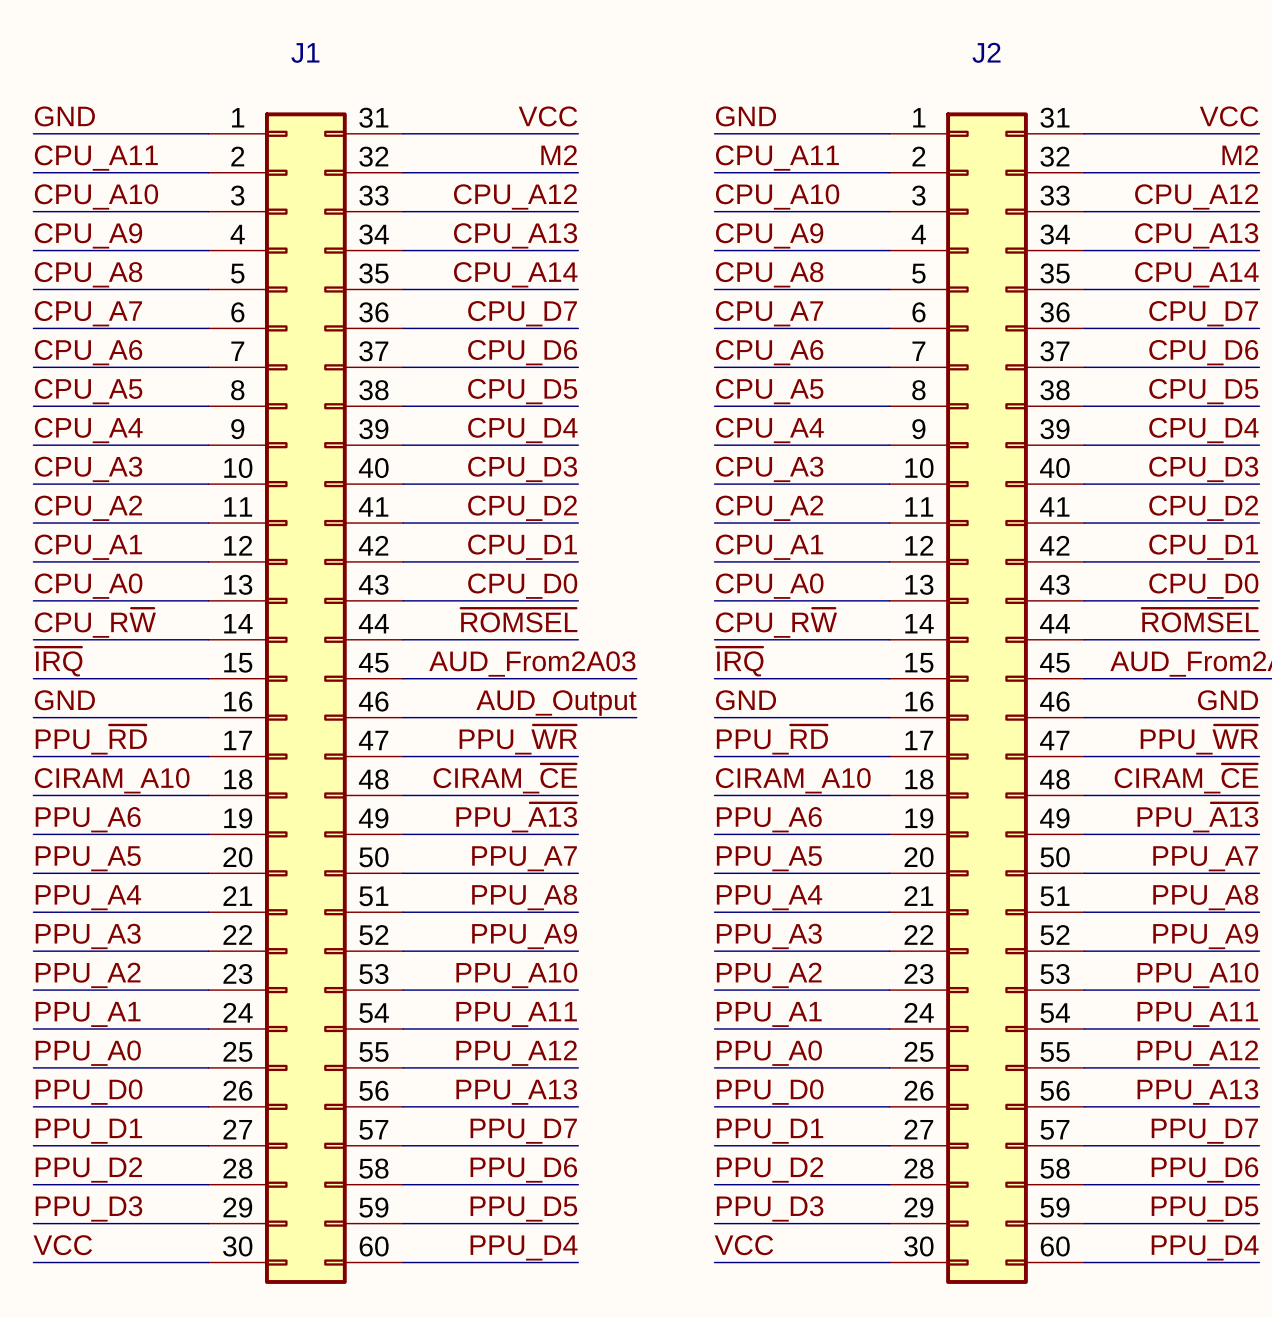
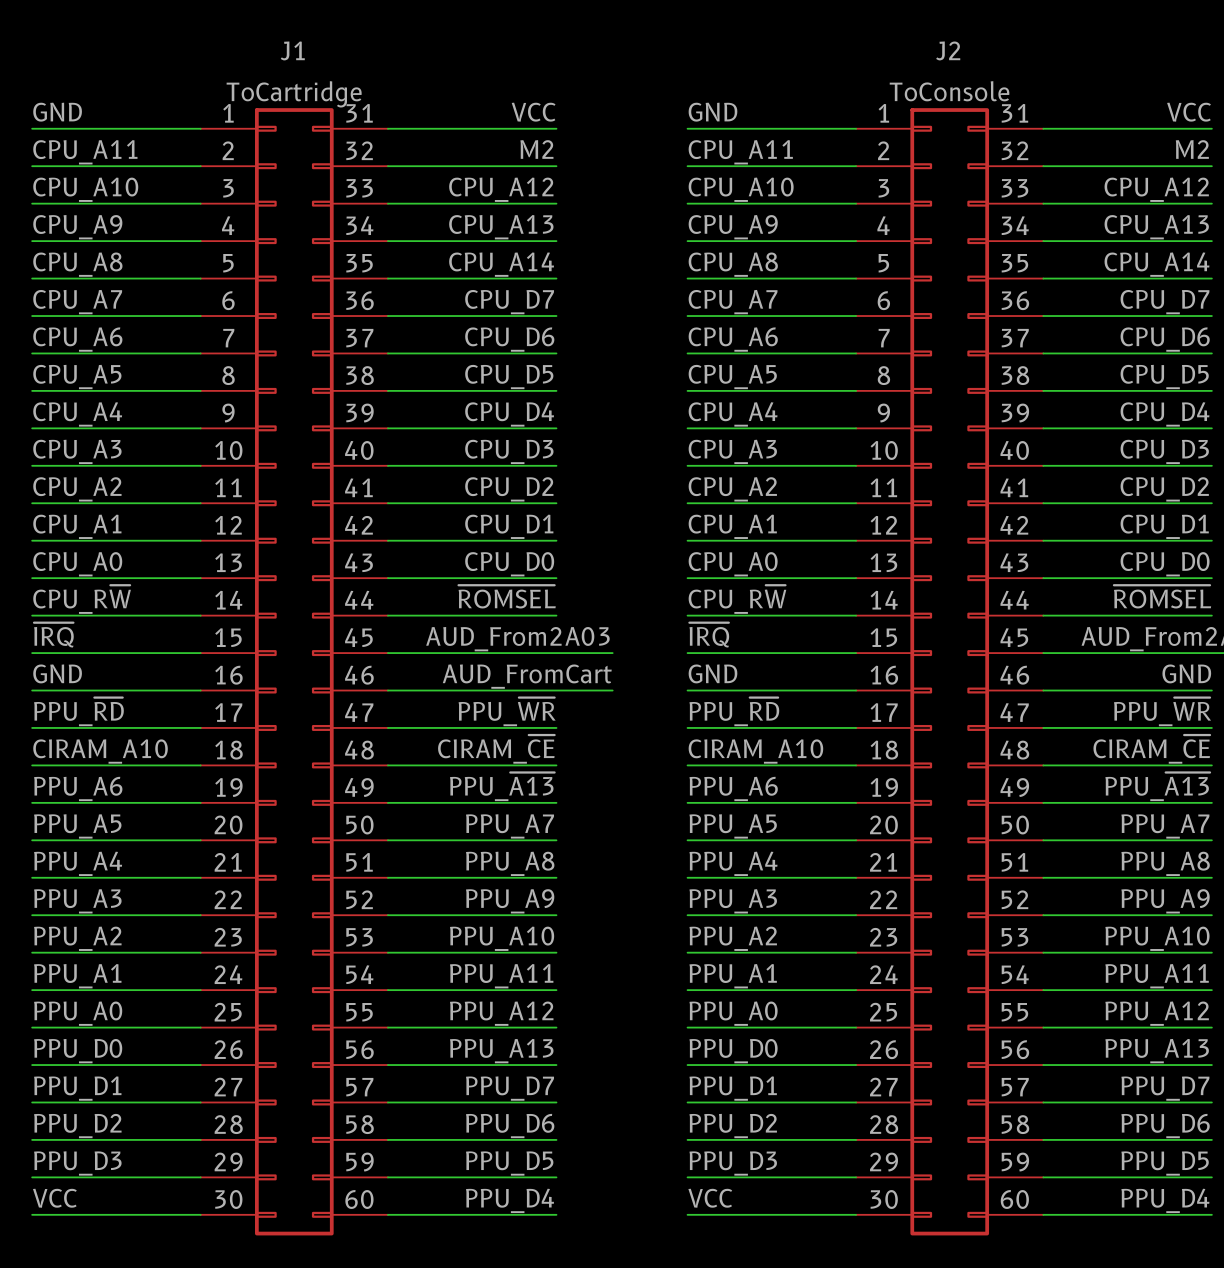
J2 value: none -> ToConsole (949, 91)
J1 value: none -> ToCartridge (294, 94)
label: AUD_Output (556, 703) -> AUD_FromCart (527, 676)

